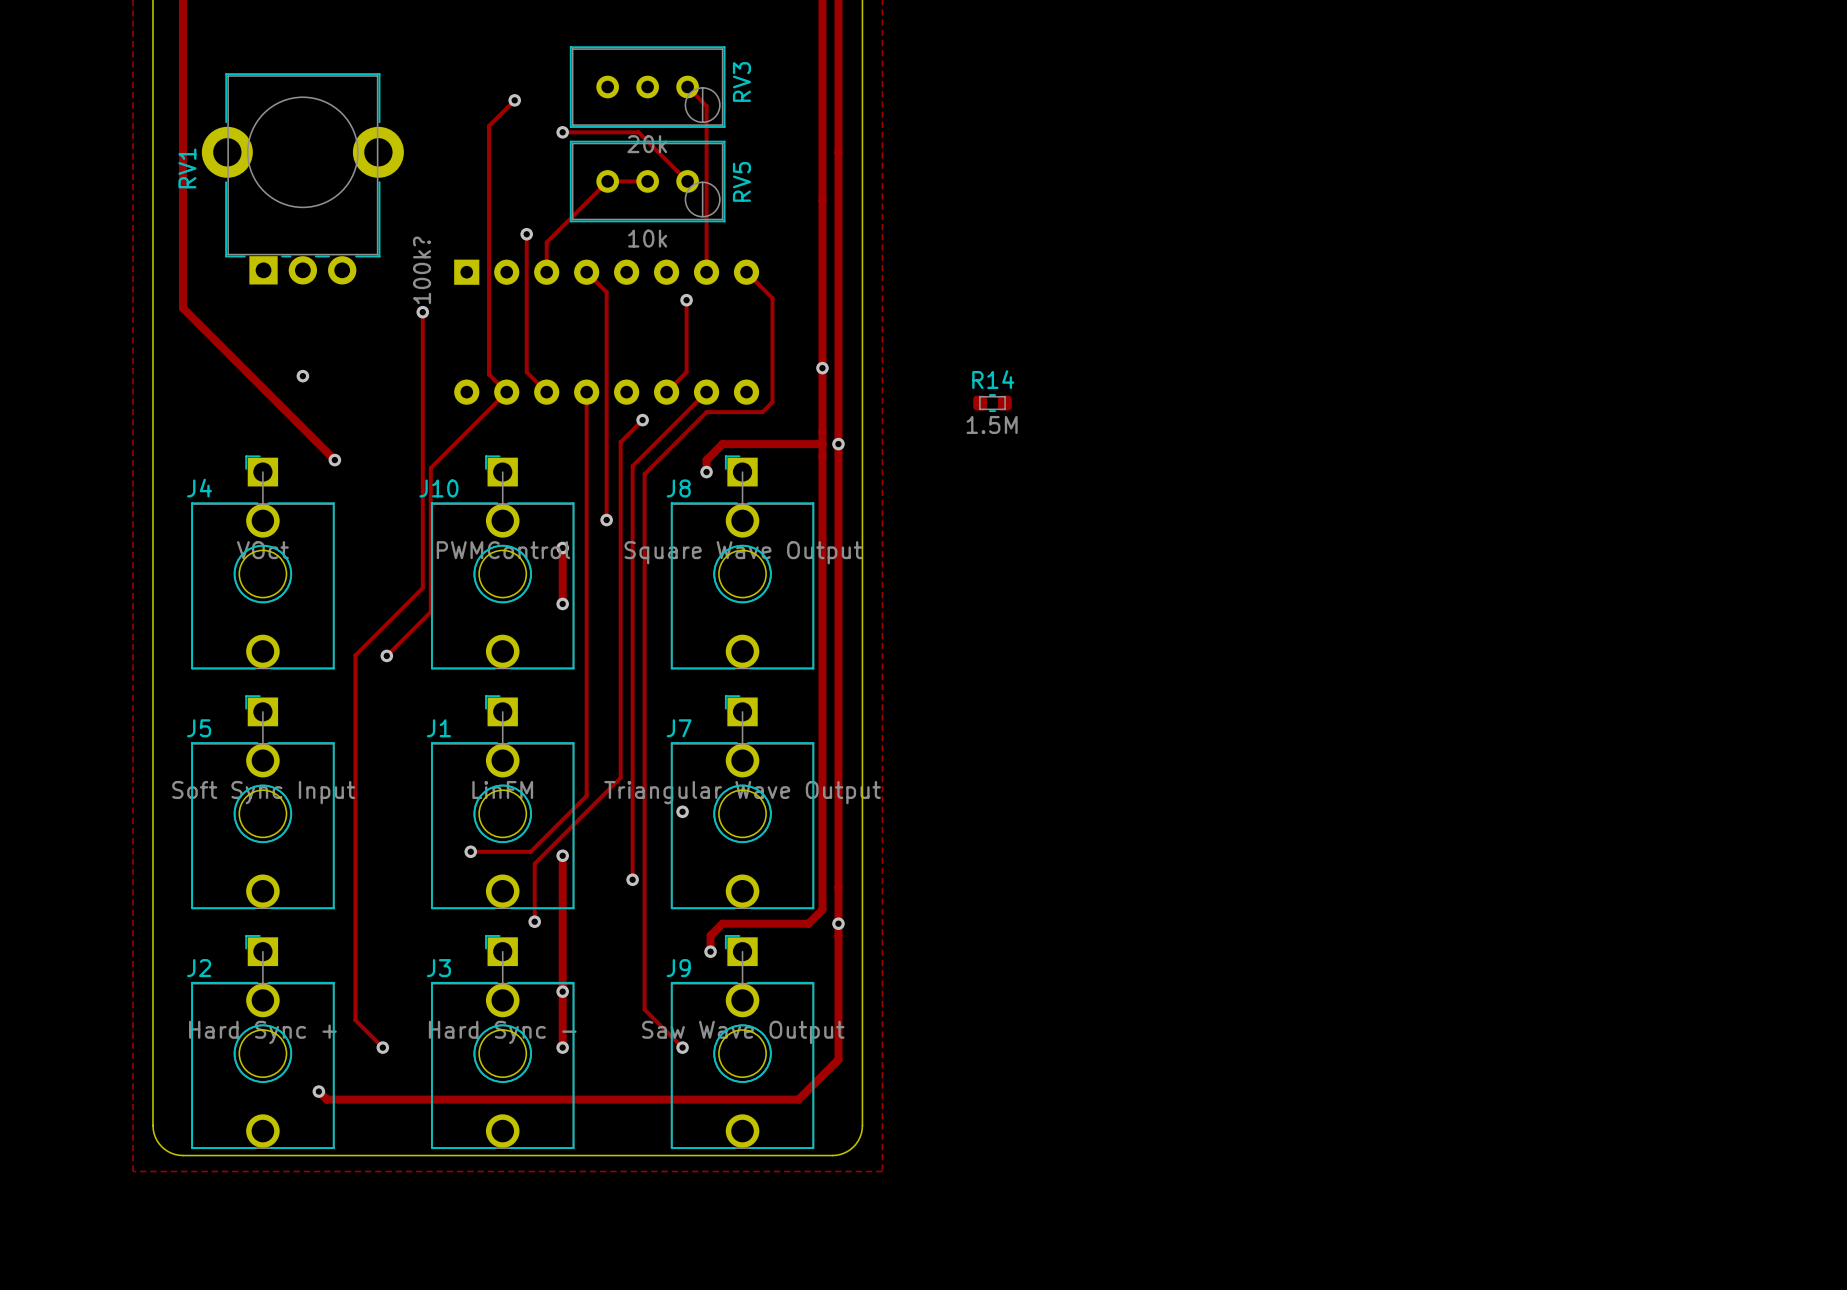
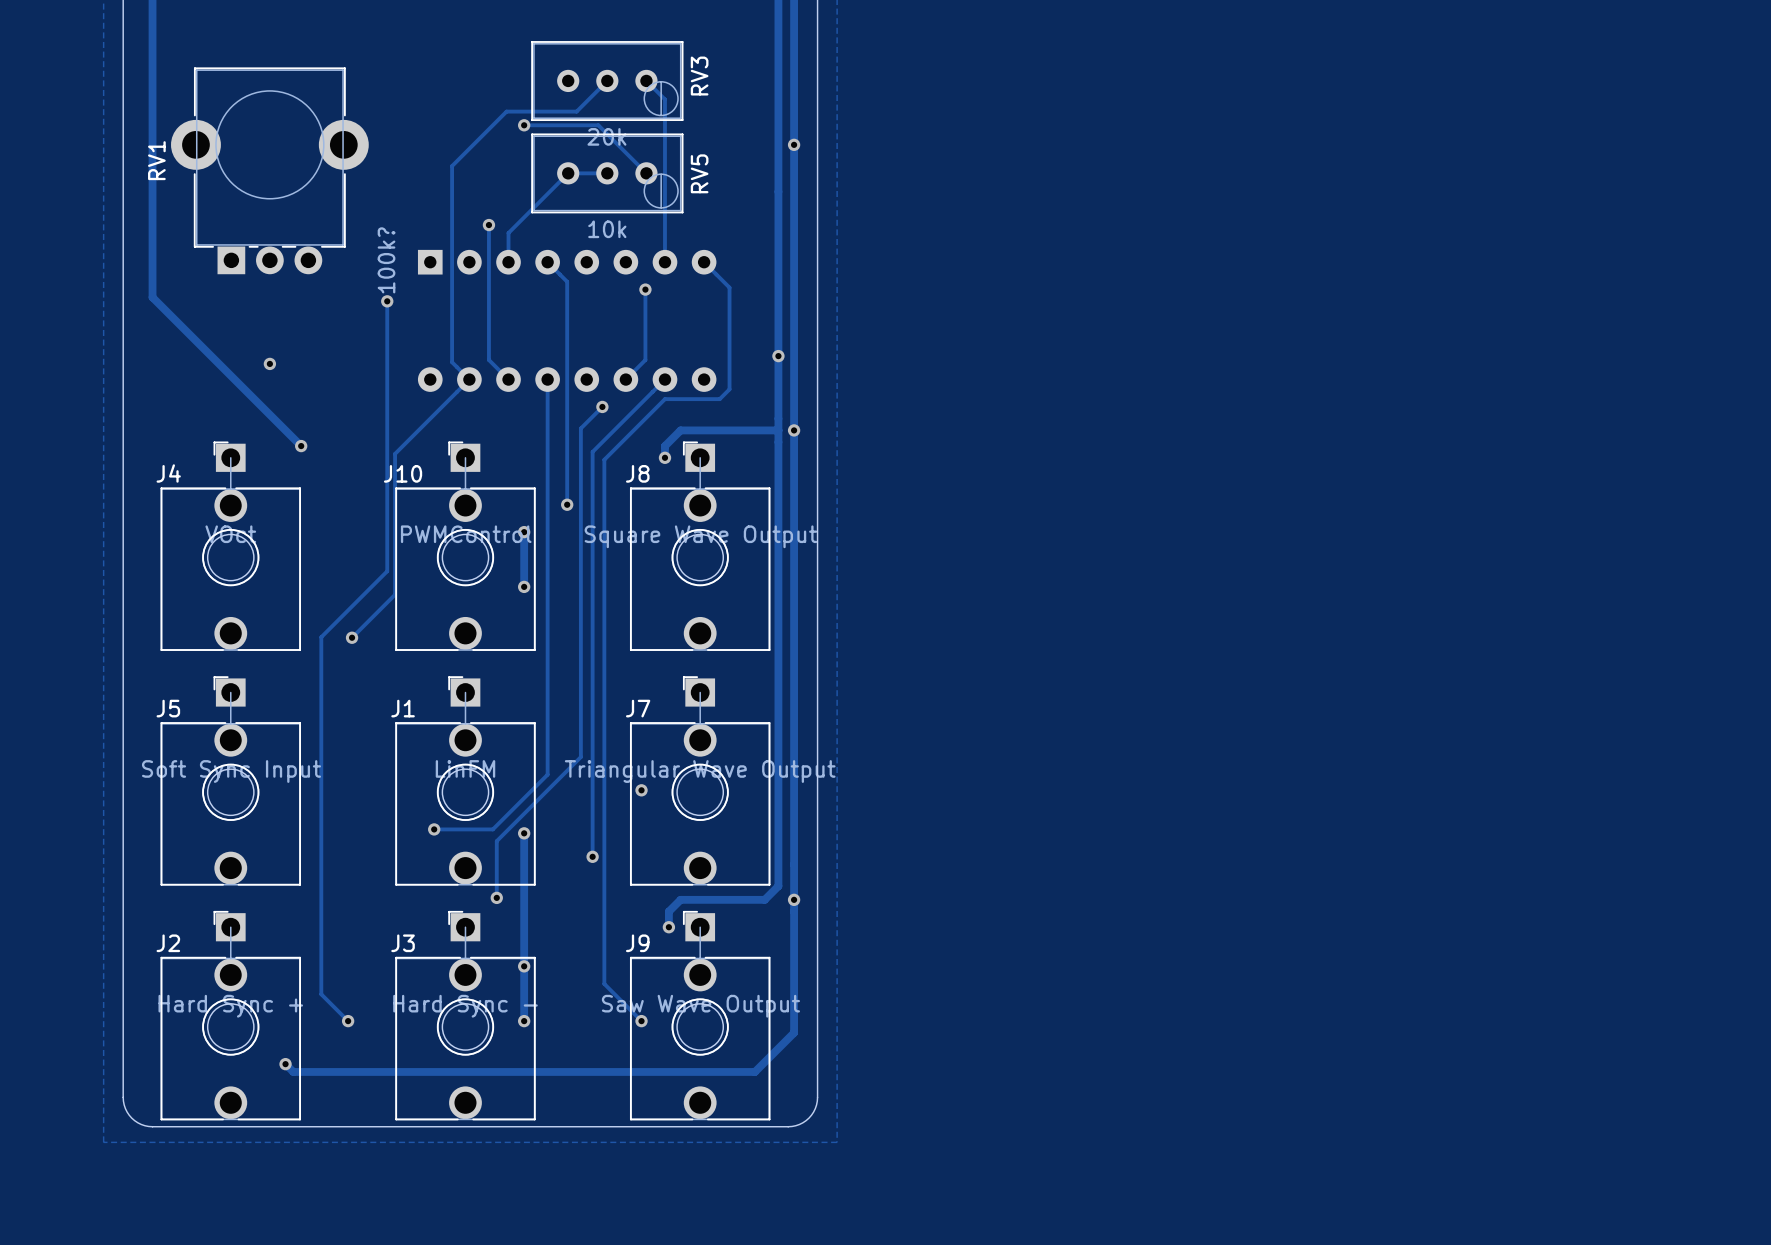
track: (514, 100) (489, 126) (489, 174) -> (607, 80) (576, 111) (506, 111) (452, 166)
via: (514, 100) -> none
via: none -> (794, 144)
R14: 1.5M (992, 403) -> none

